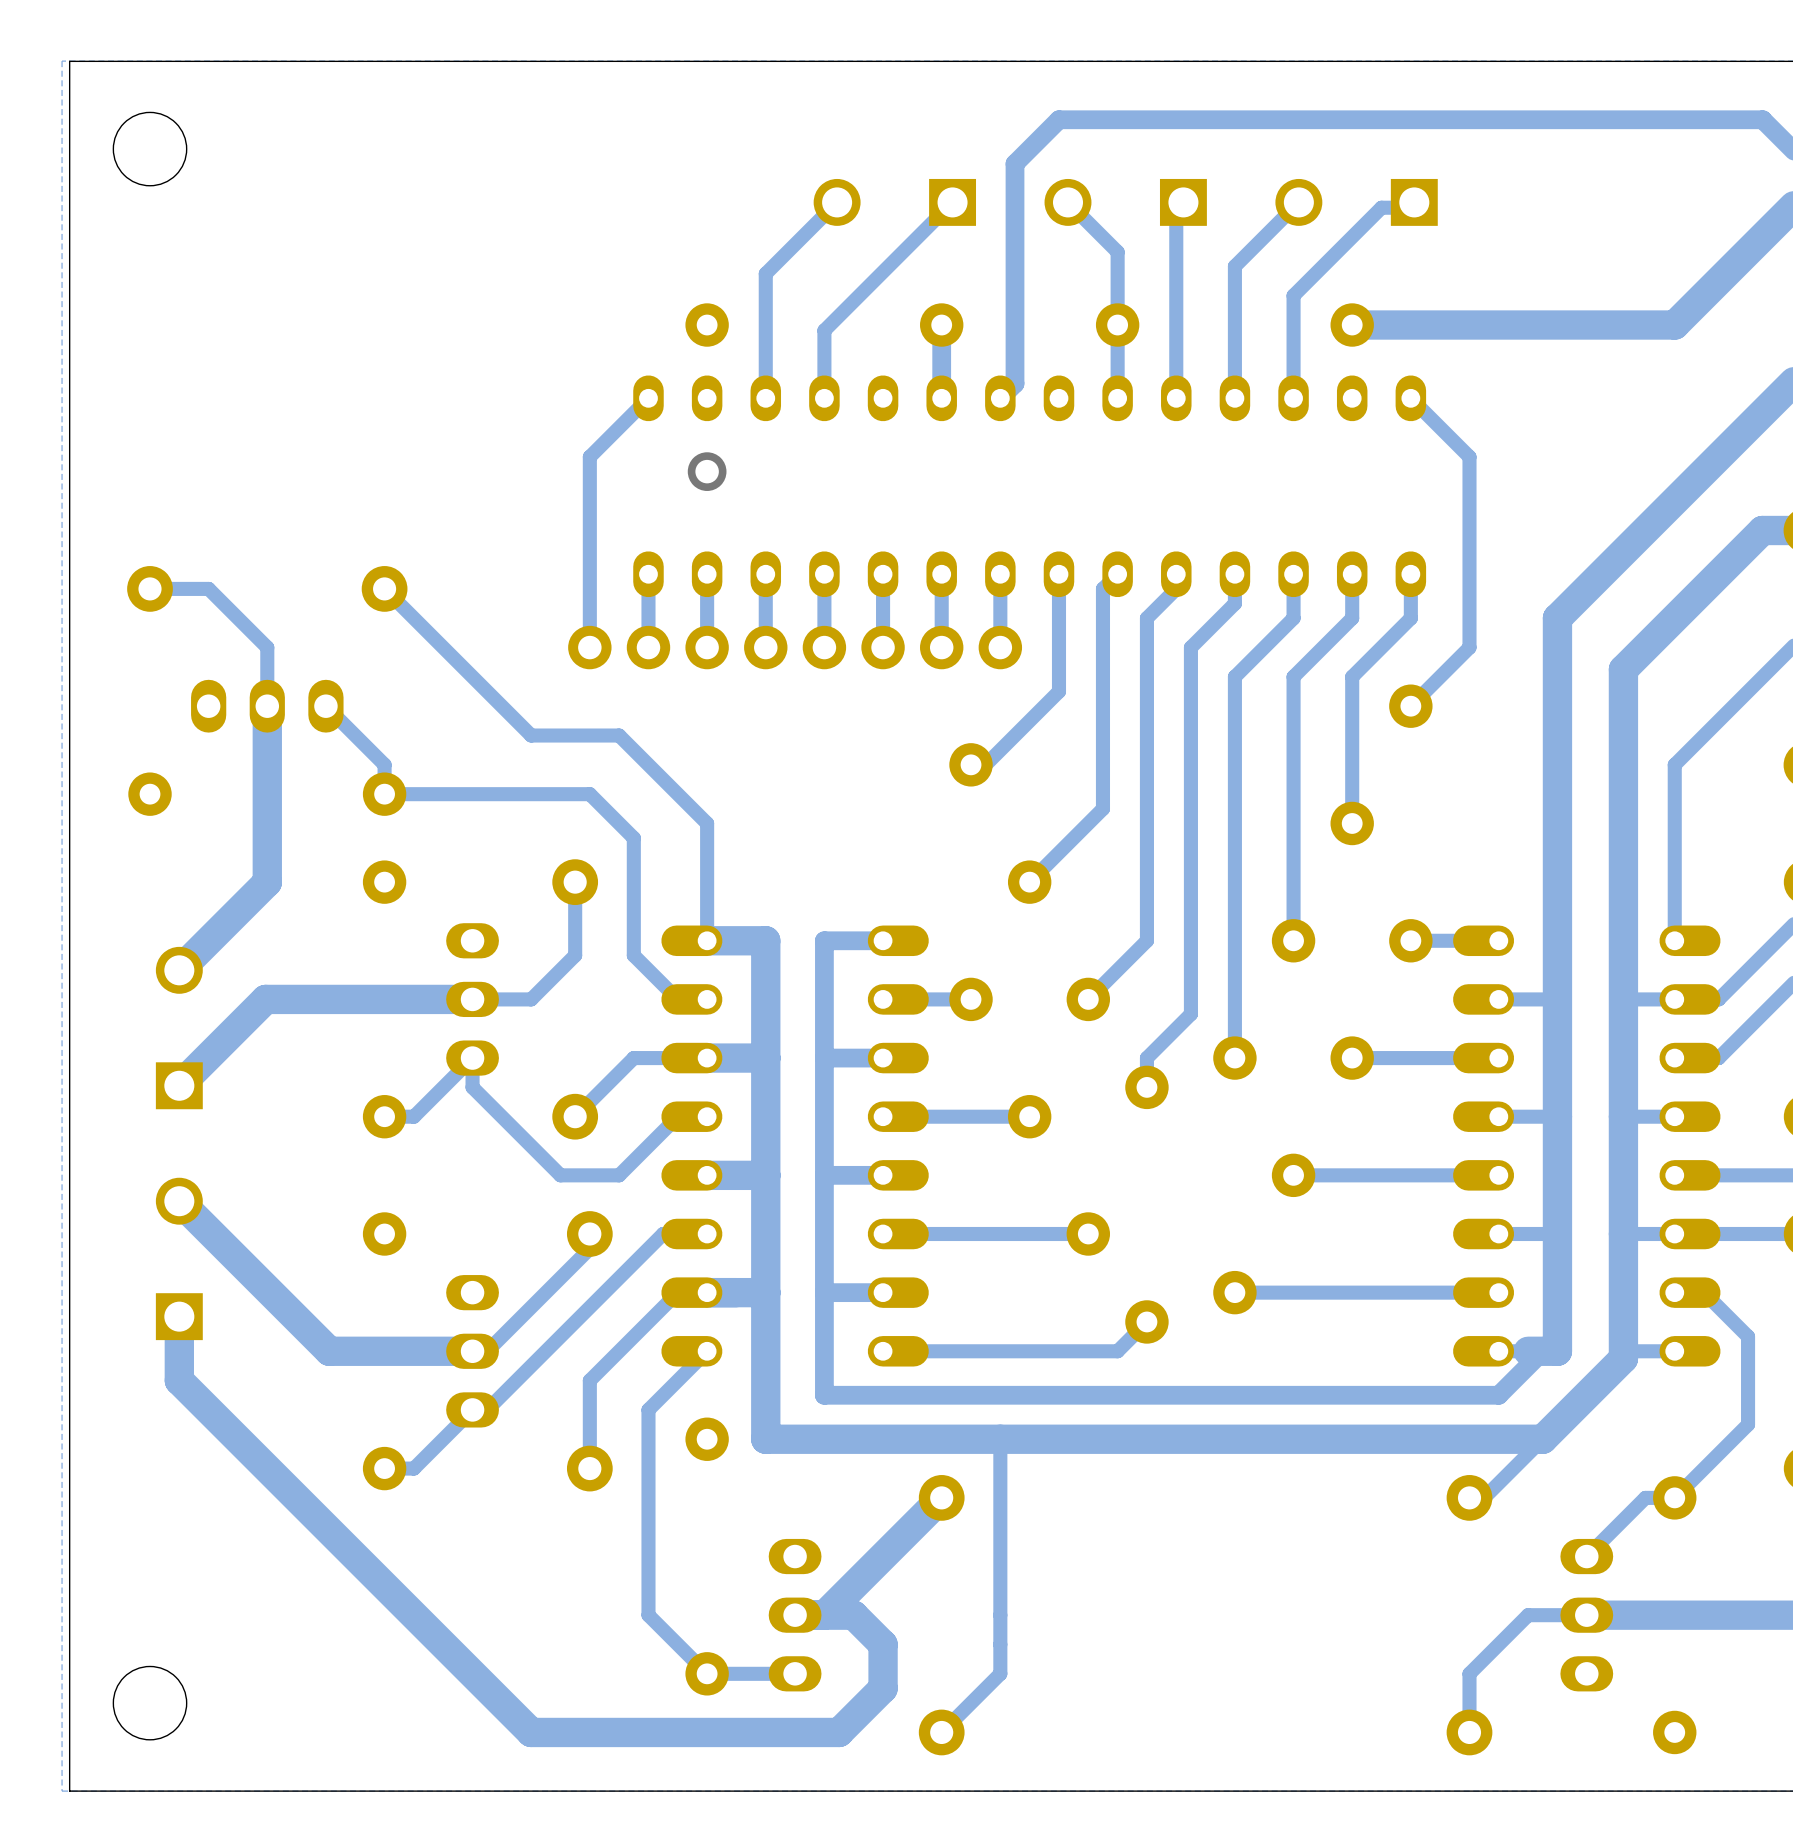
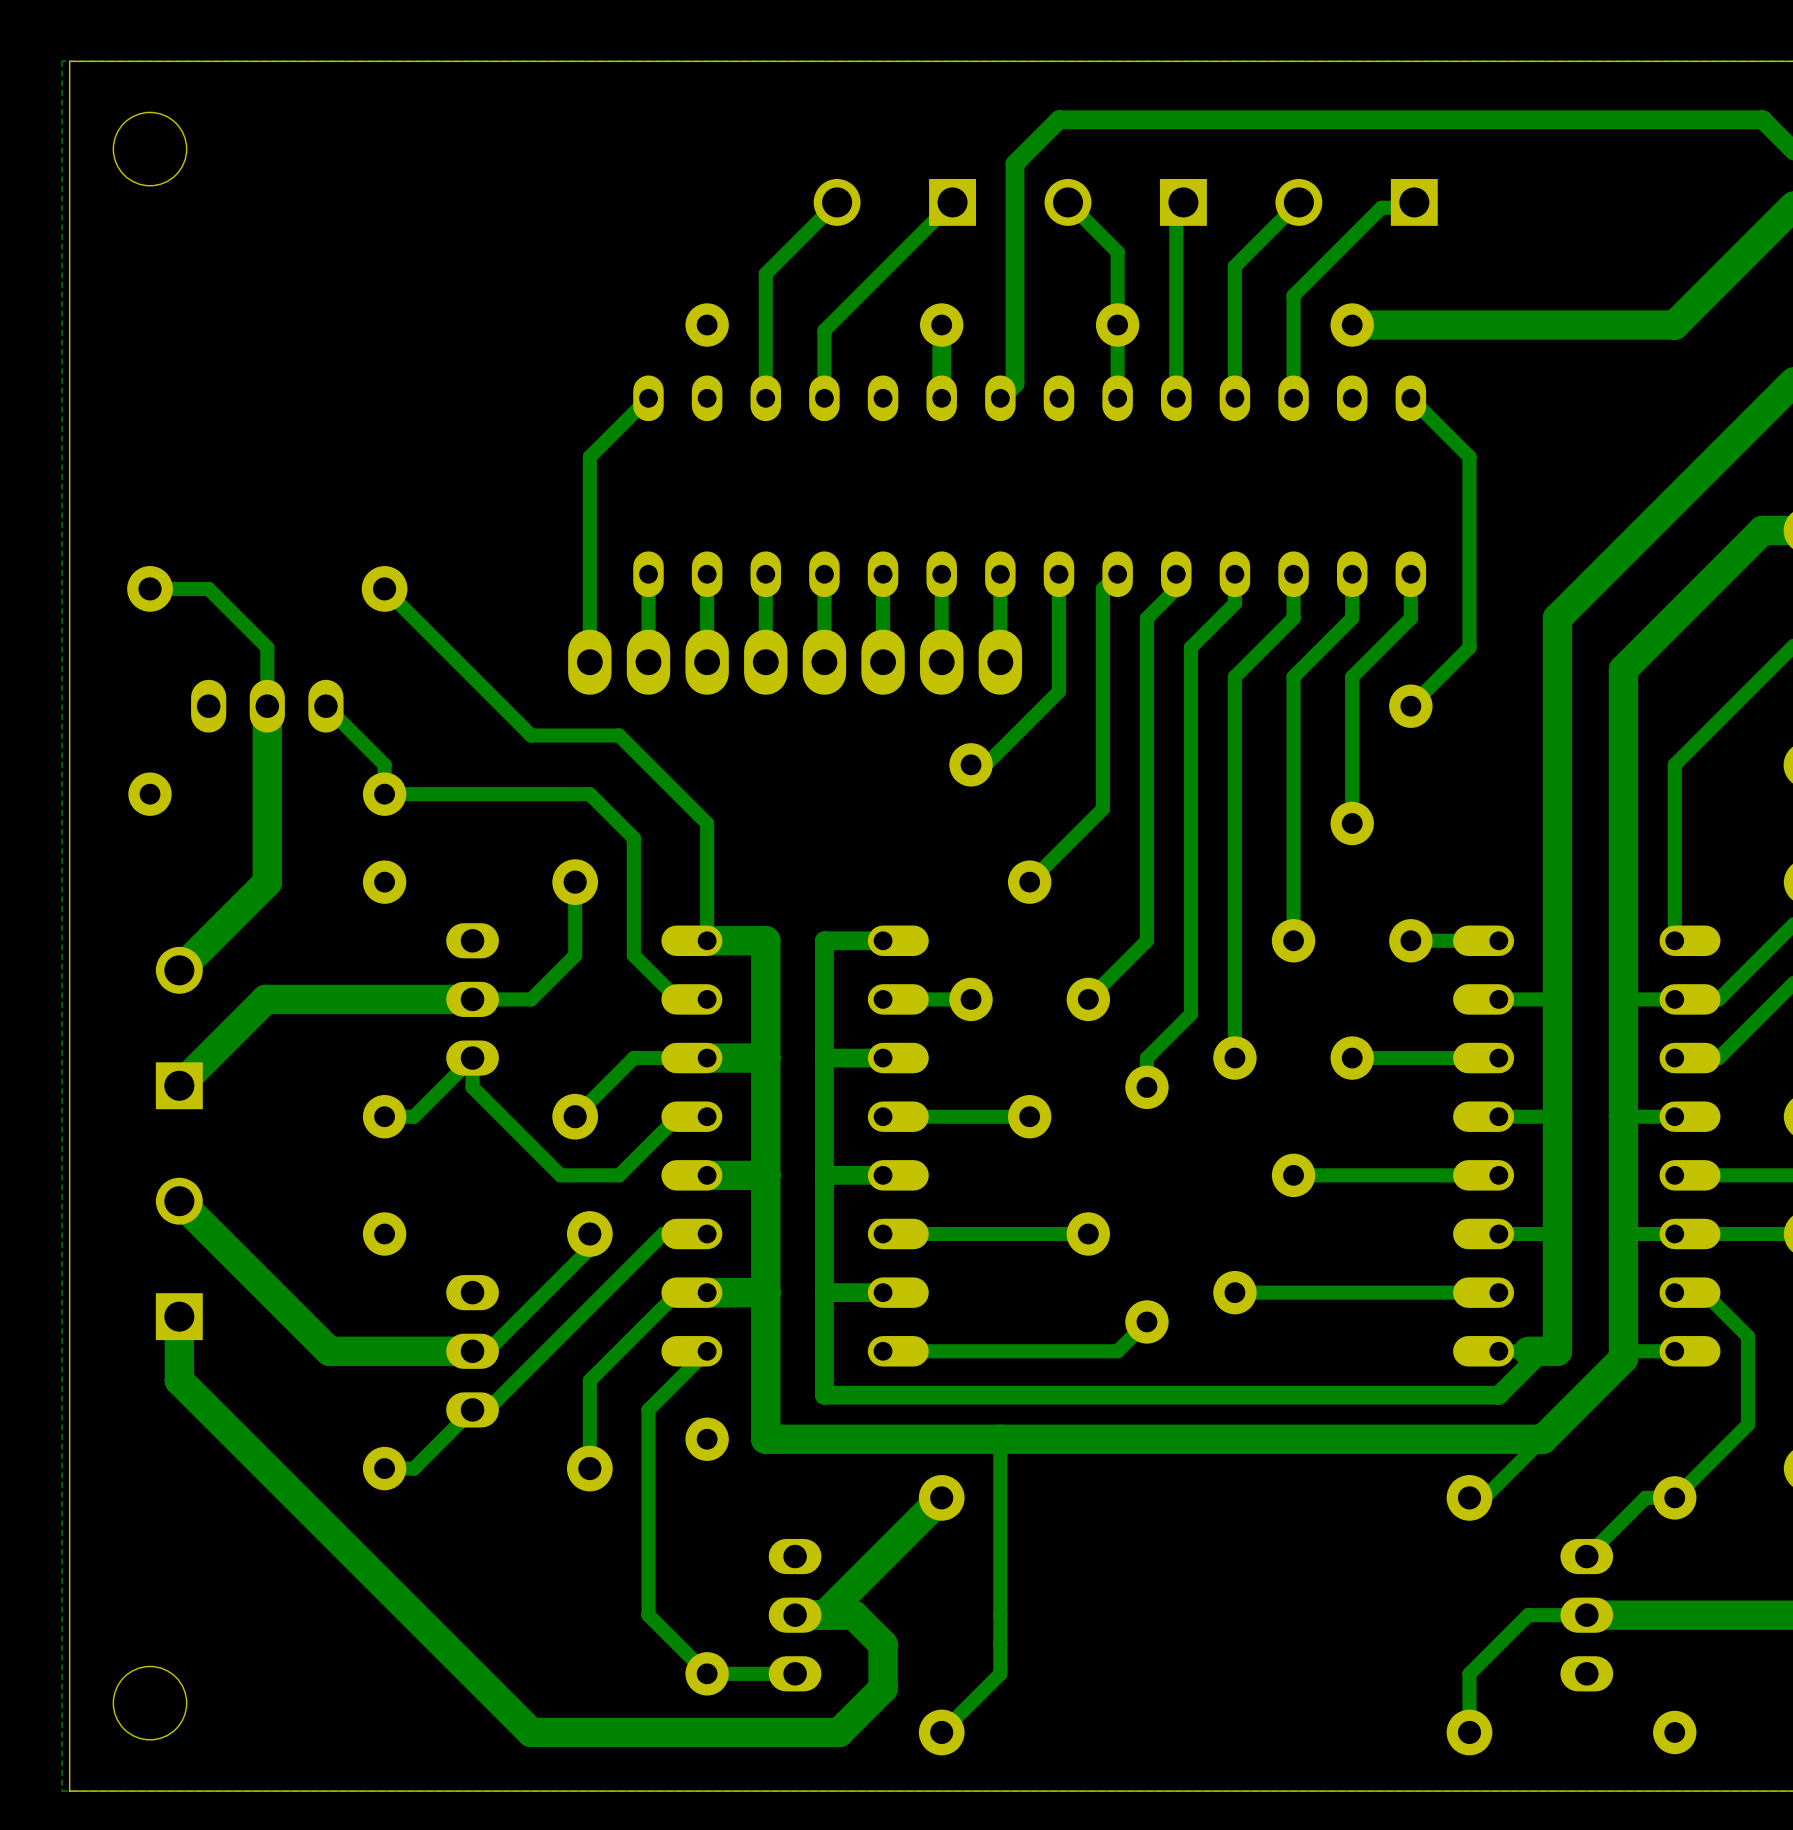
via: (707, 471) -> none
part footprint: [568, 625, 1023, 670] -> [568, 629, 1023, 695]

